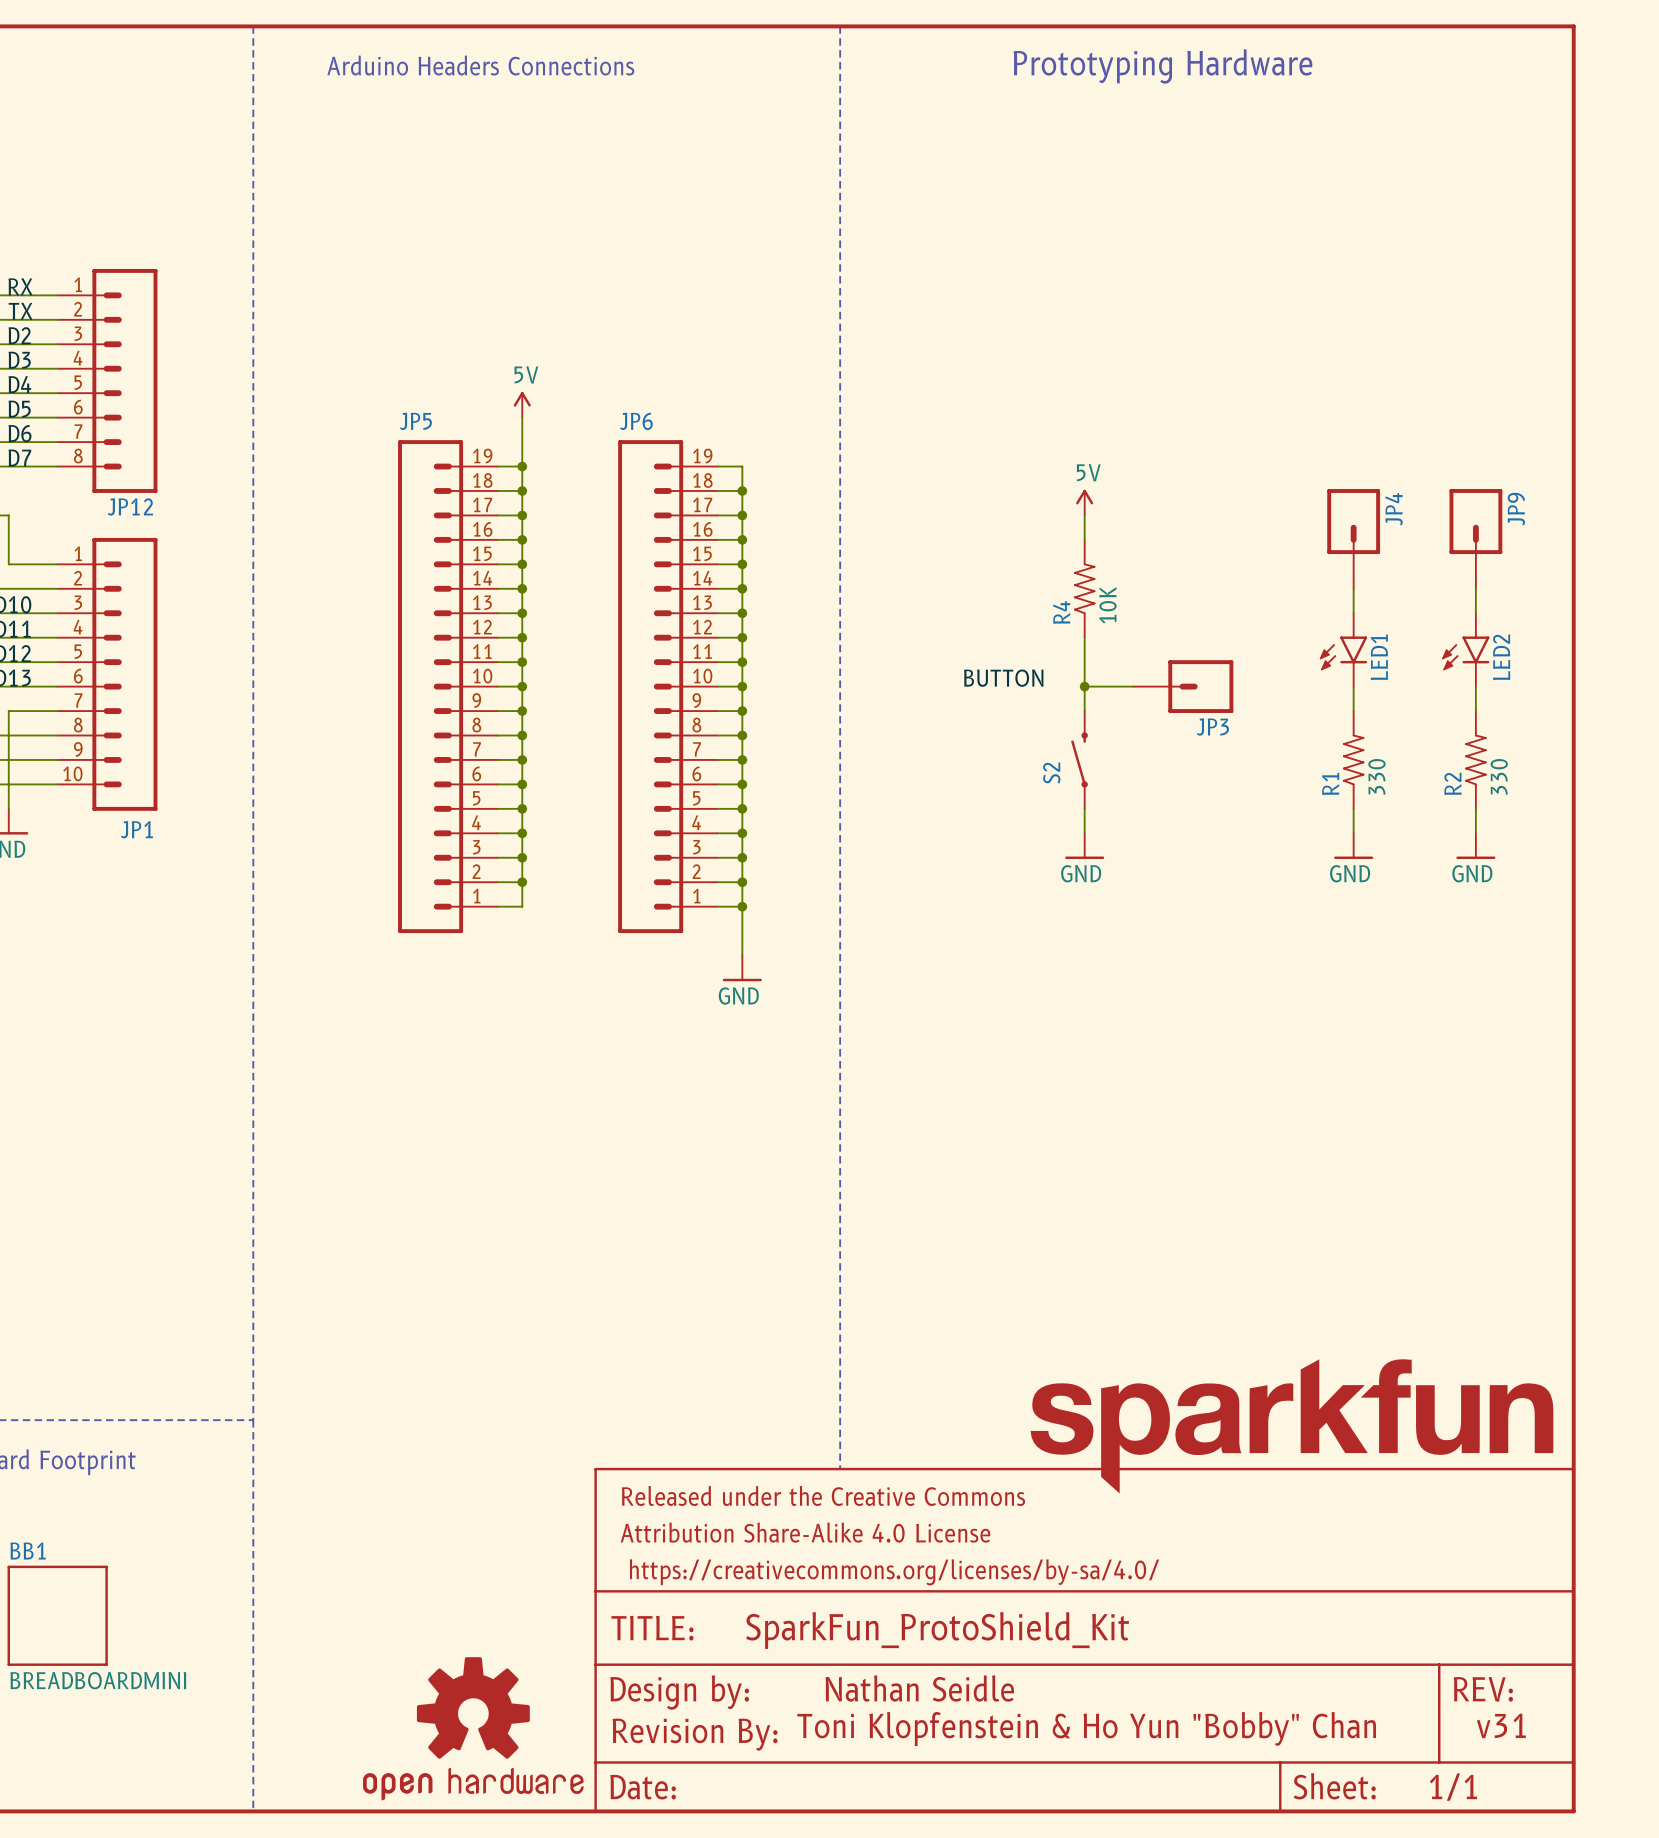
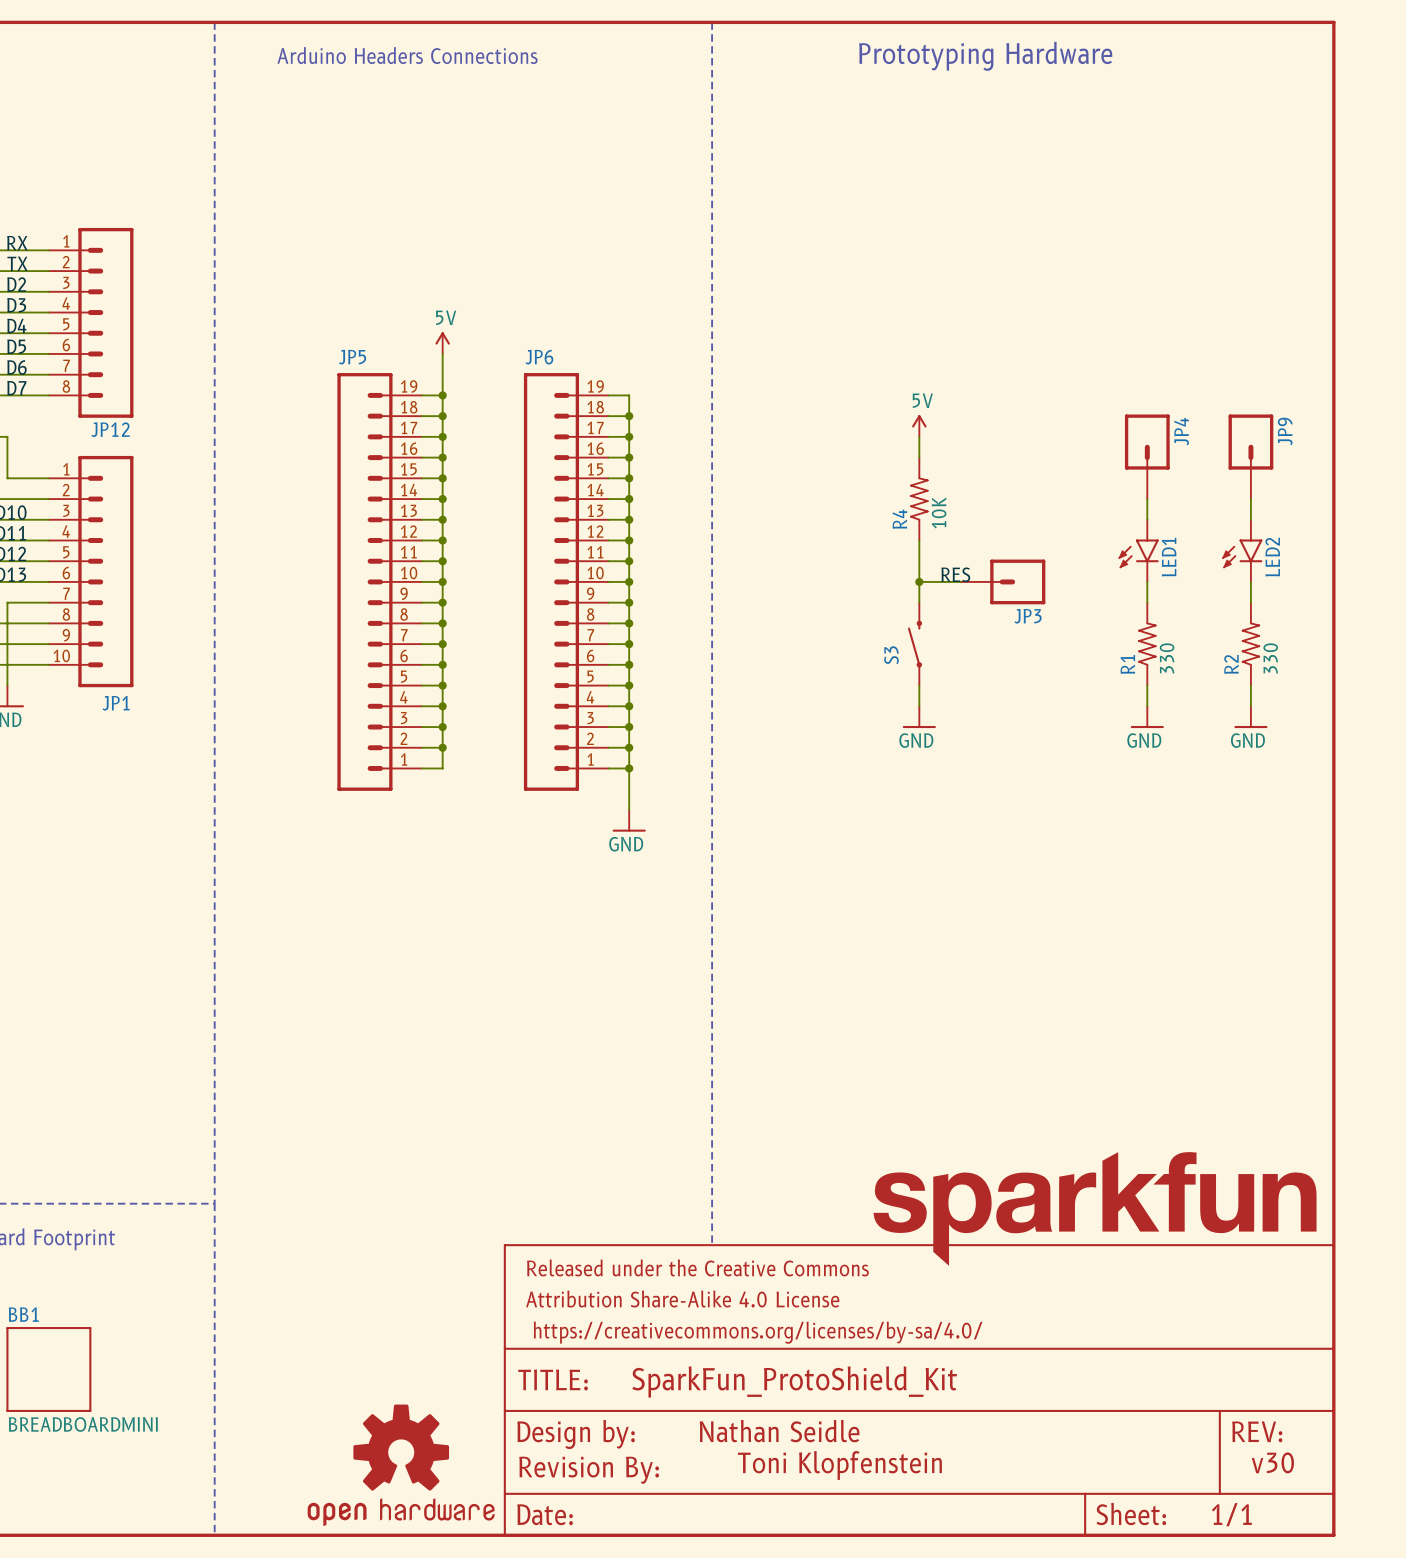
label: BUTTON (1003, 678) -> none
label: none -> RES (955, 574)
S2 name: S2 (1051, 773) -> S3 (891, 655)
text: v31 (1501, 1725) -> v30 (1272, 1462)
text: Toni Klopfenstein & Ho Yun "Bobby" Chan (1086, 1729) -> Toni Klopfenstein (839, 1465)

